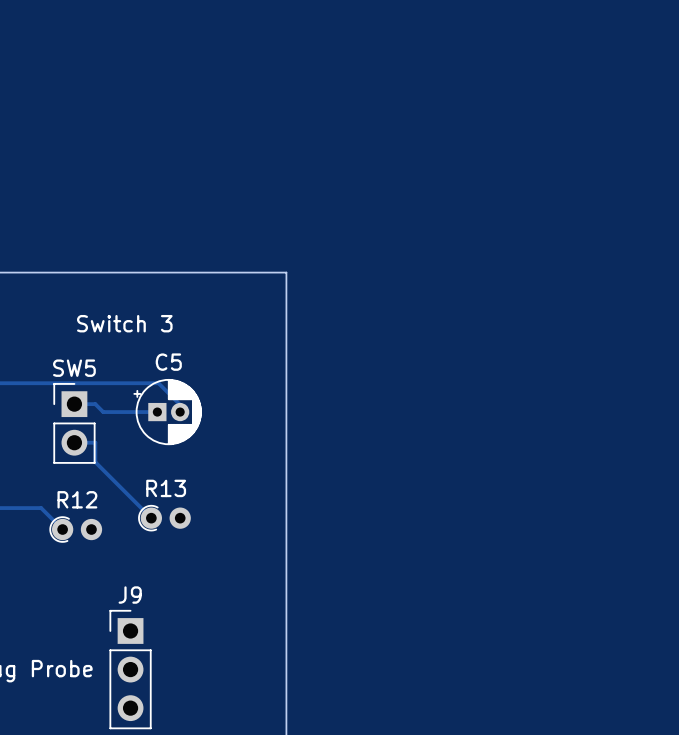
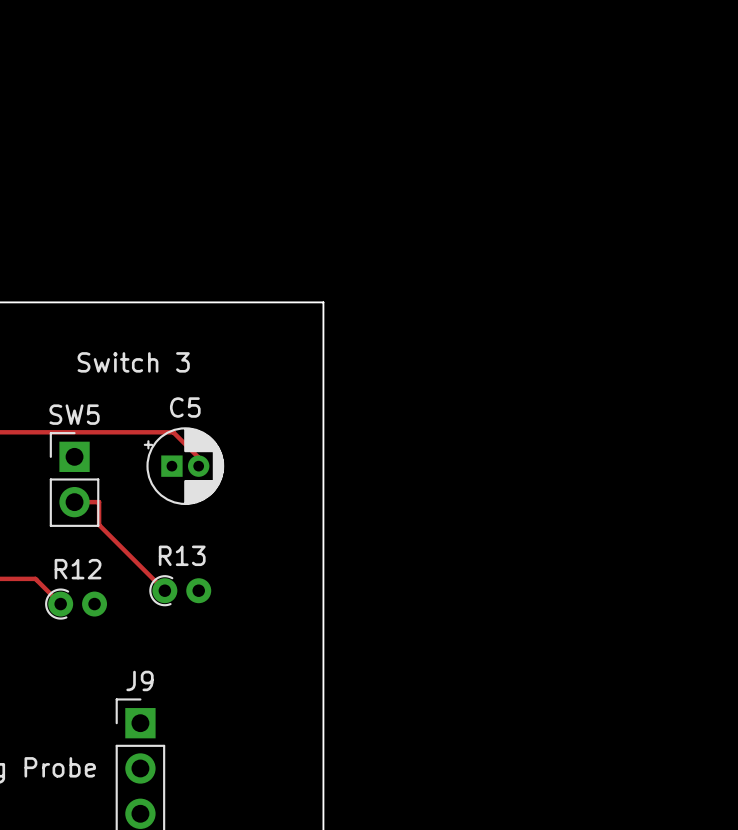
track: (74, 404) (95, 404) (103, 412) (157, 412) -> none

